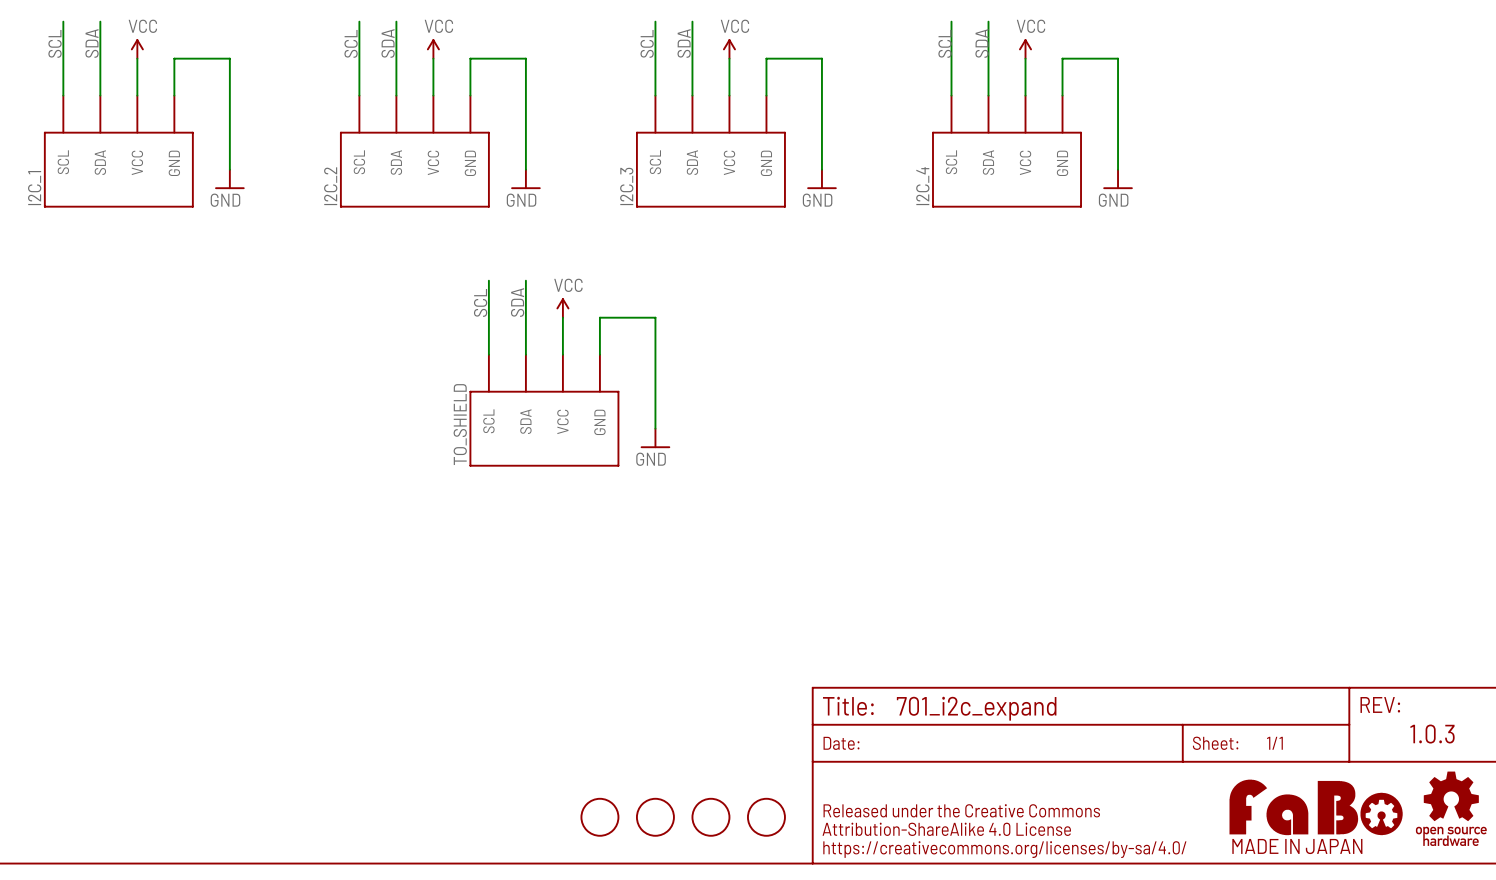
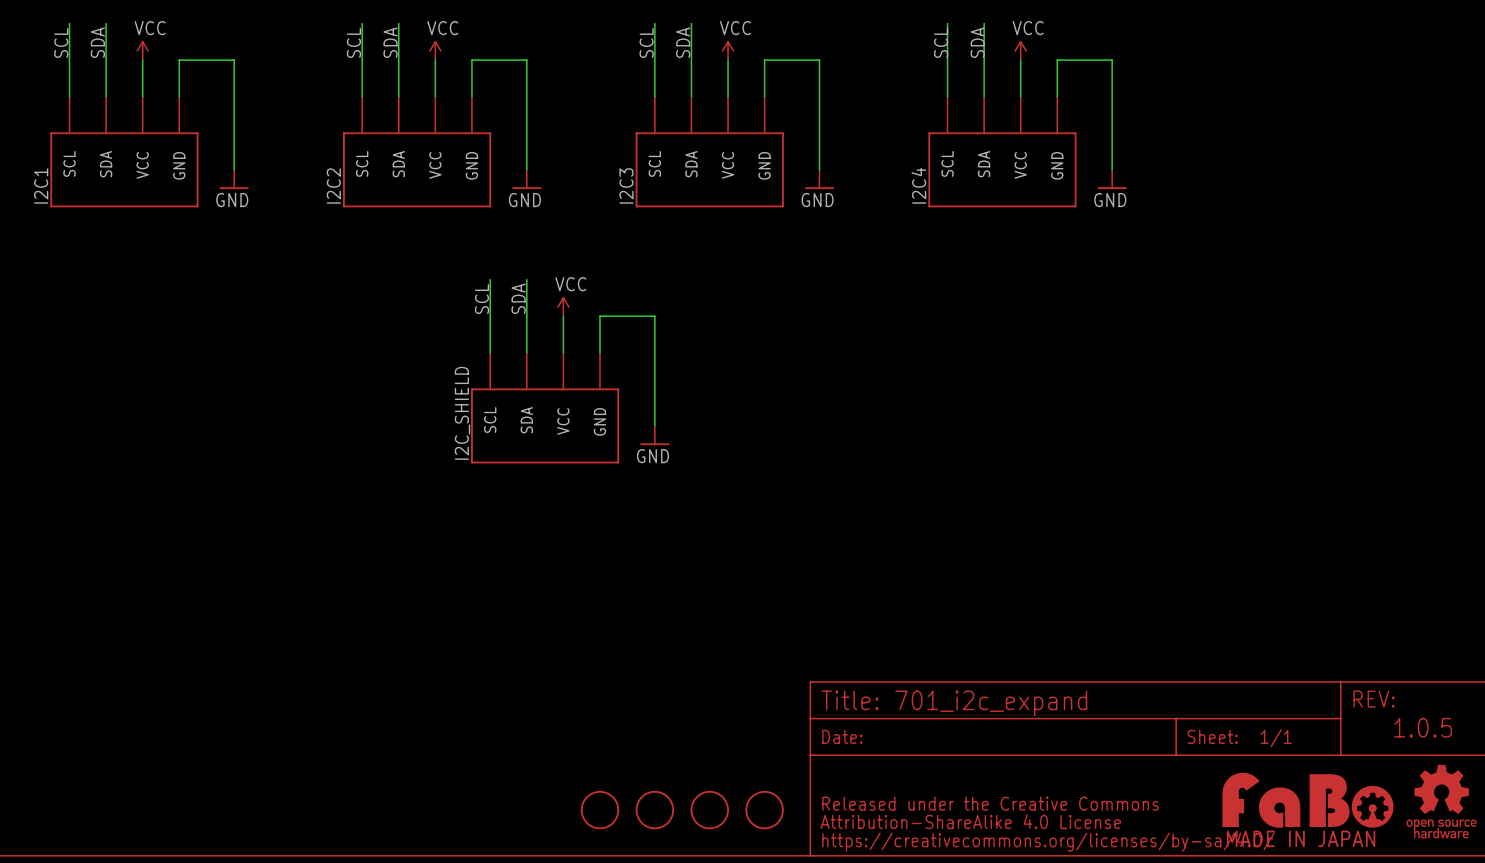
I2C_2 name: I2C_2 (330, 186) -> I2C2 (333, 186)
I2C_3 name: I2C_3 (626, 186) -> I2C3 (626, 186)
I2C_4 name: I2C_4 (922, 186) -> I2C4 (918, 185)
I2C_1 name: I2C_1 (34, 188) -> I2C1 (41, 186)
TO_SHIELD name: TO_SHIELD (460, 424) -> I2C_SHIELD (462, 413)
text: 1.0.3 (1432, 734) -> 1.0.5 (1423, 727)

